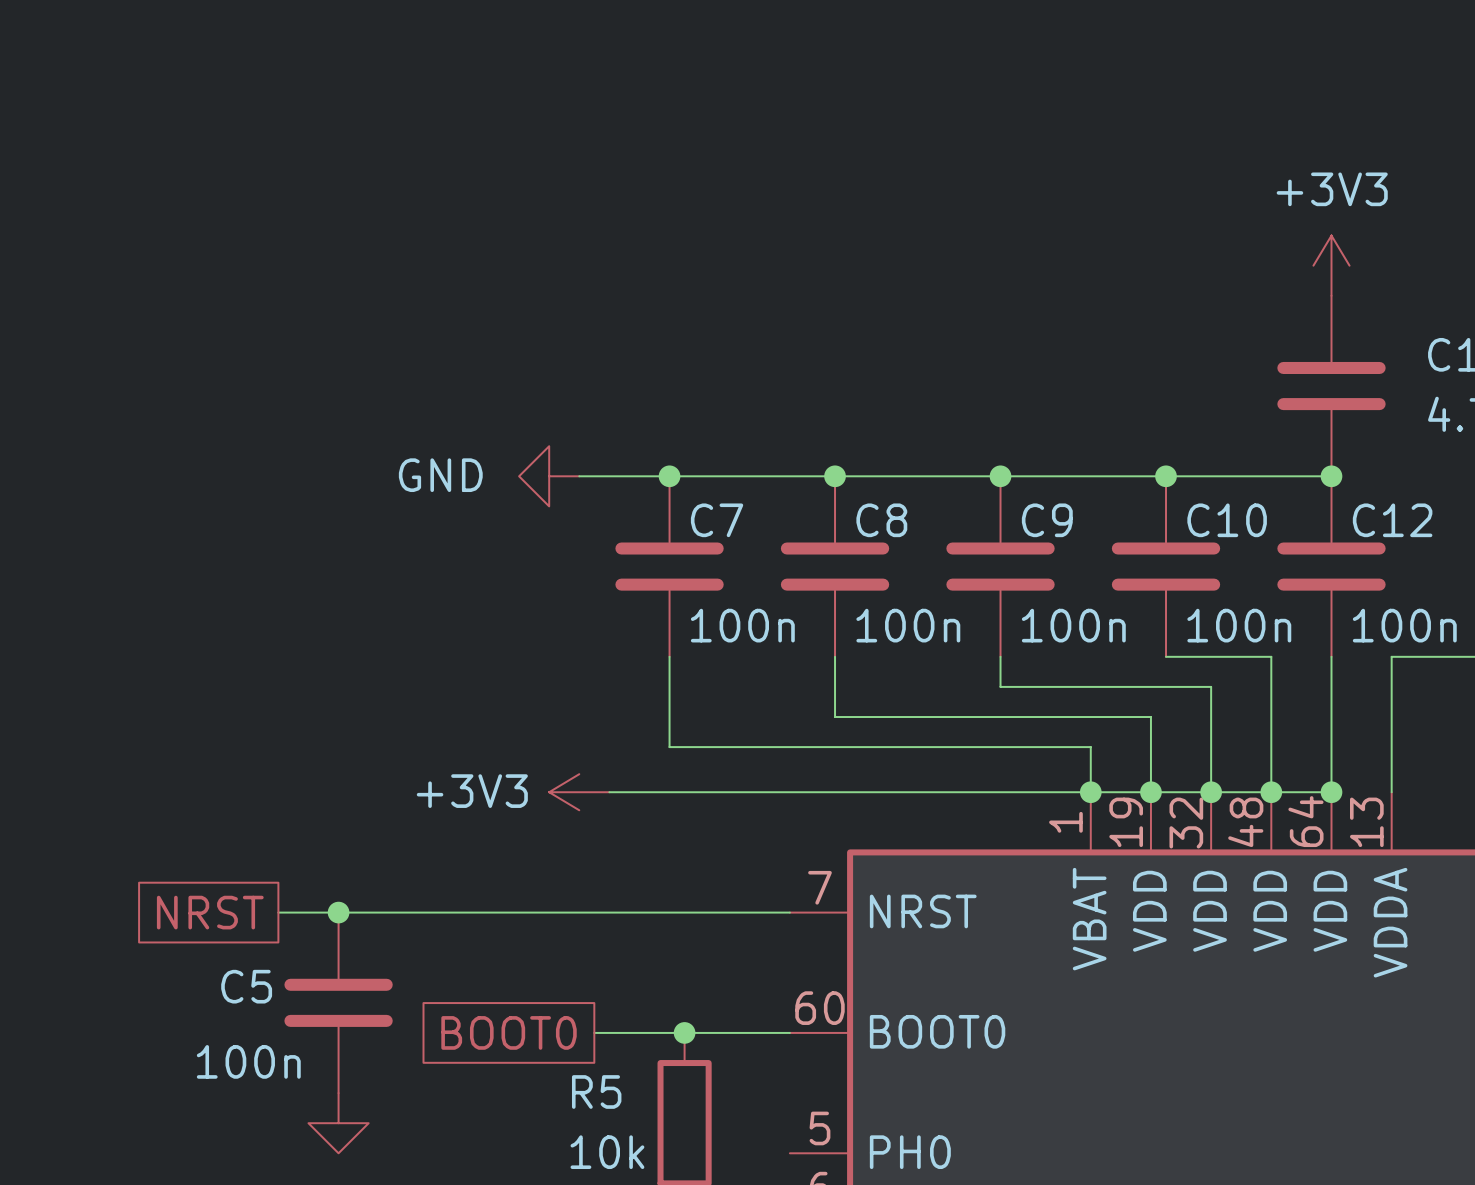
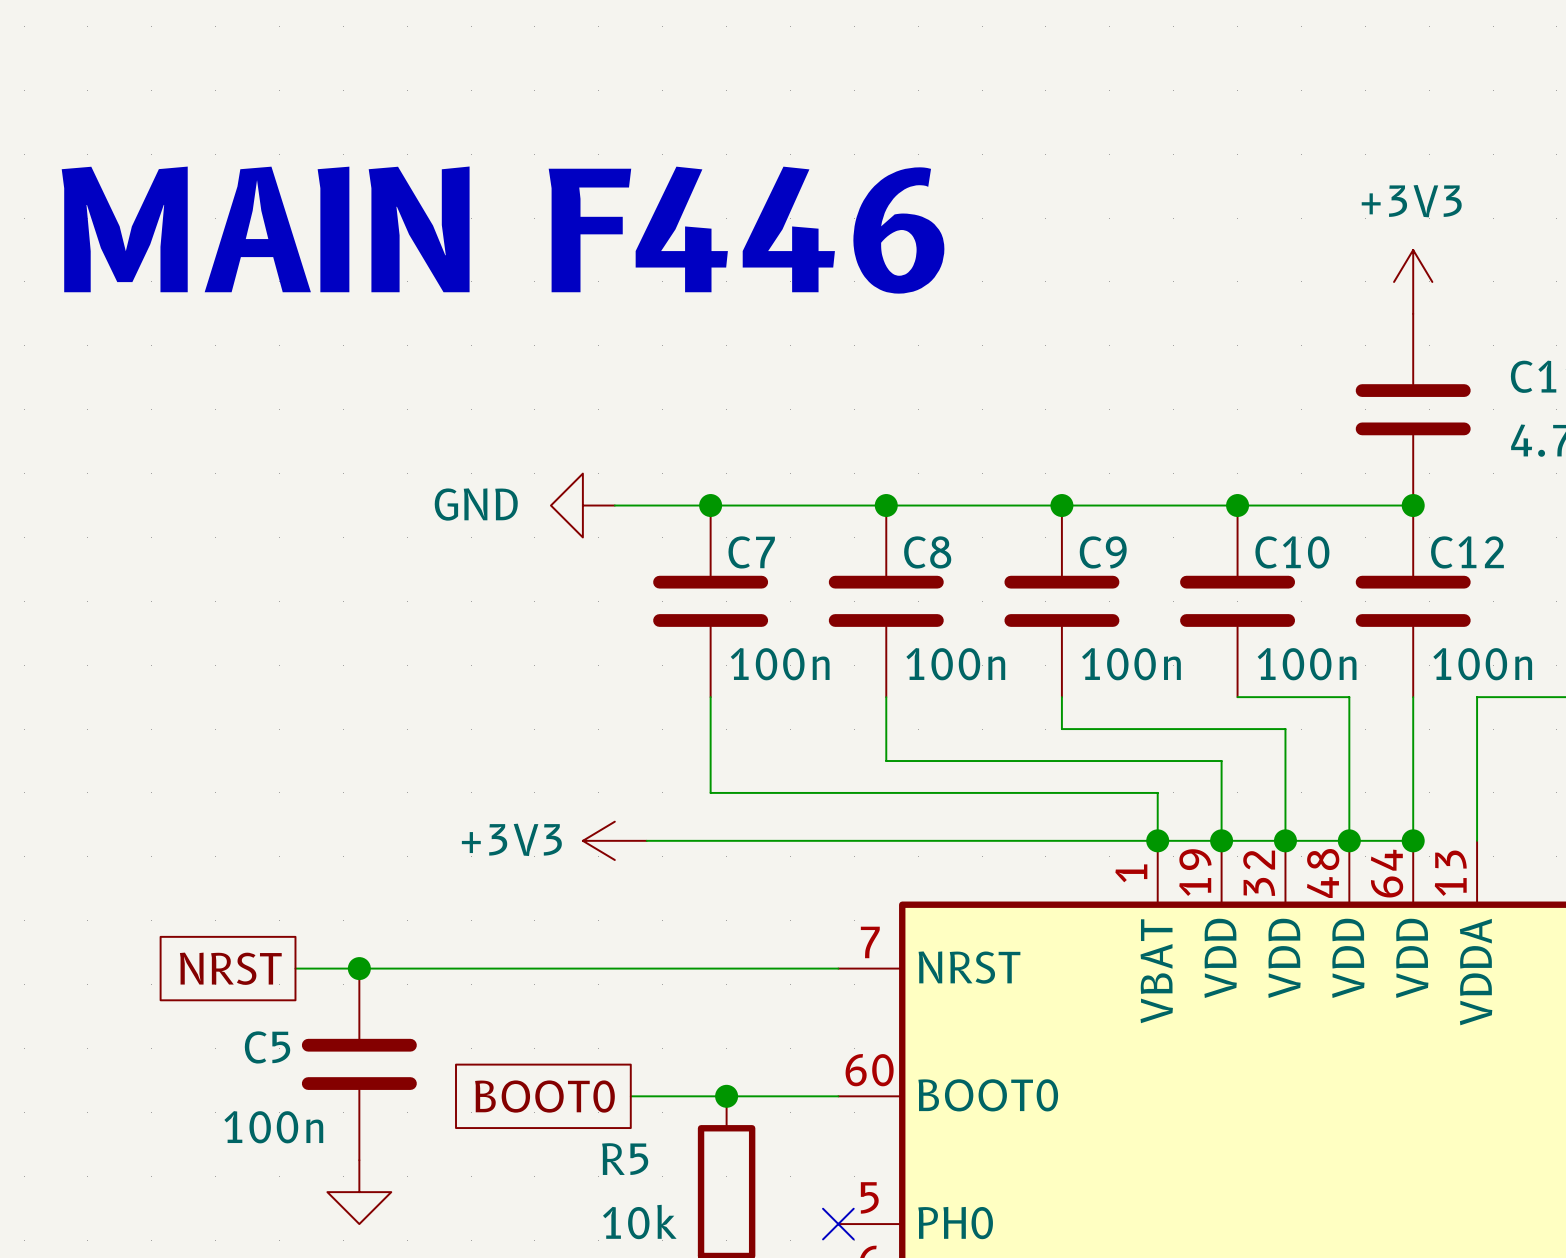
text: none -> MAIN F446 (503, 230)
no-connect mark: none -> (838, 1224)

